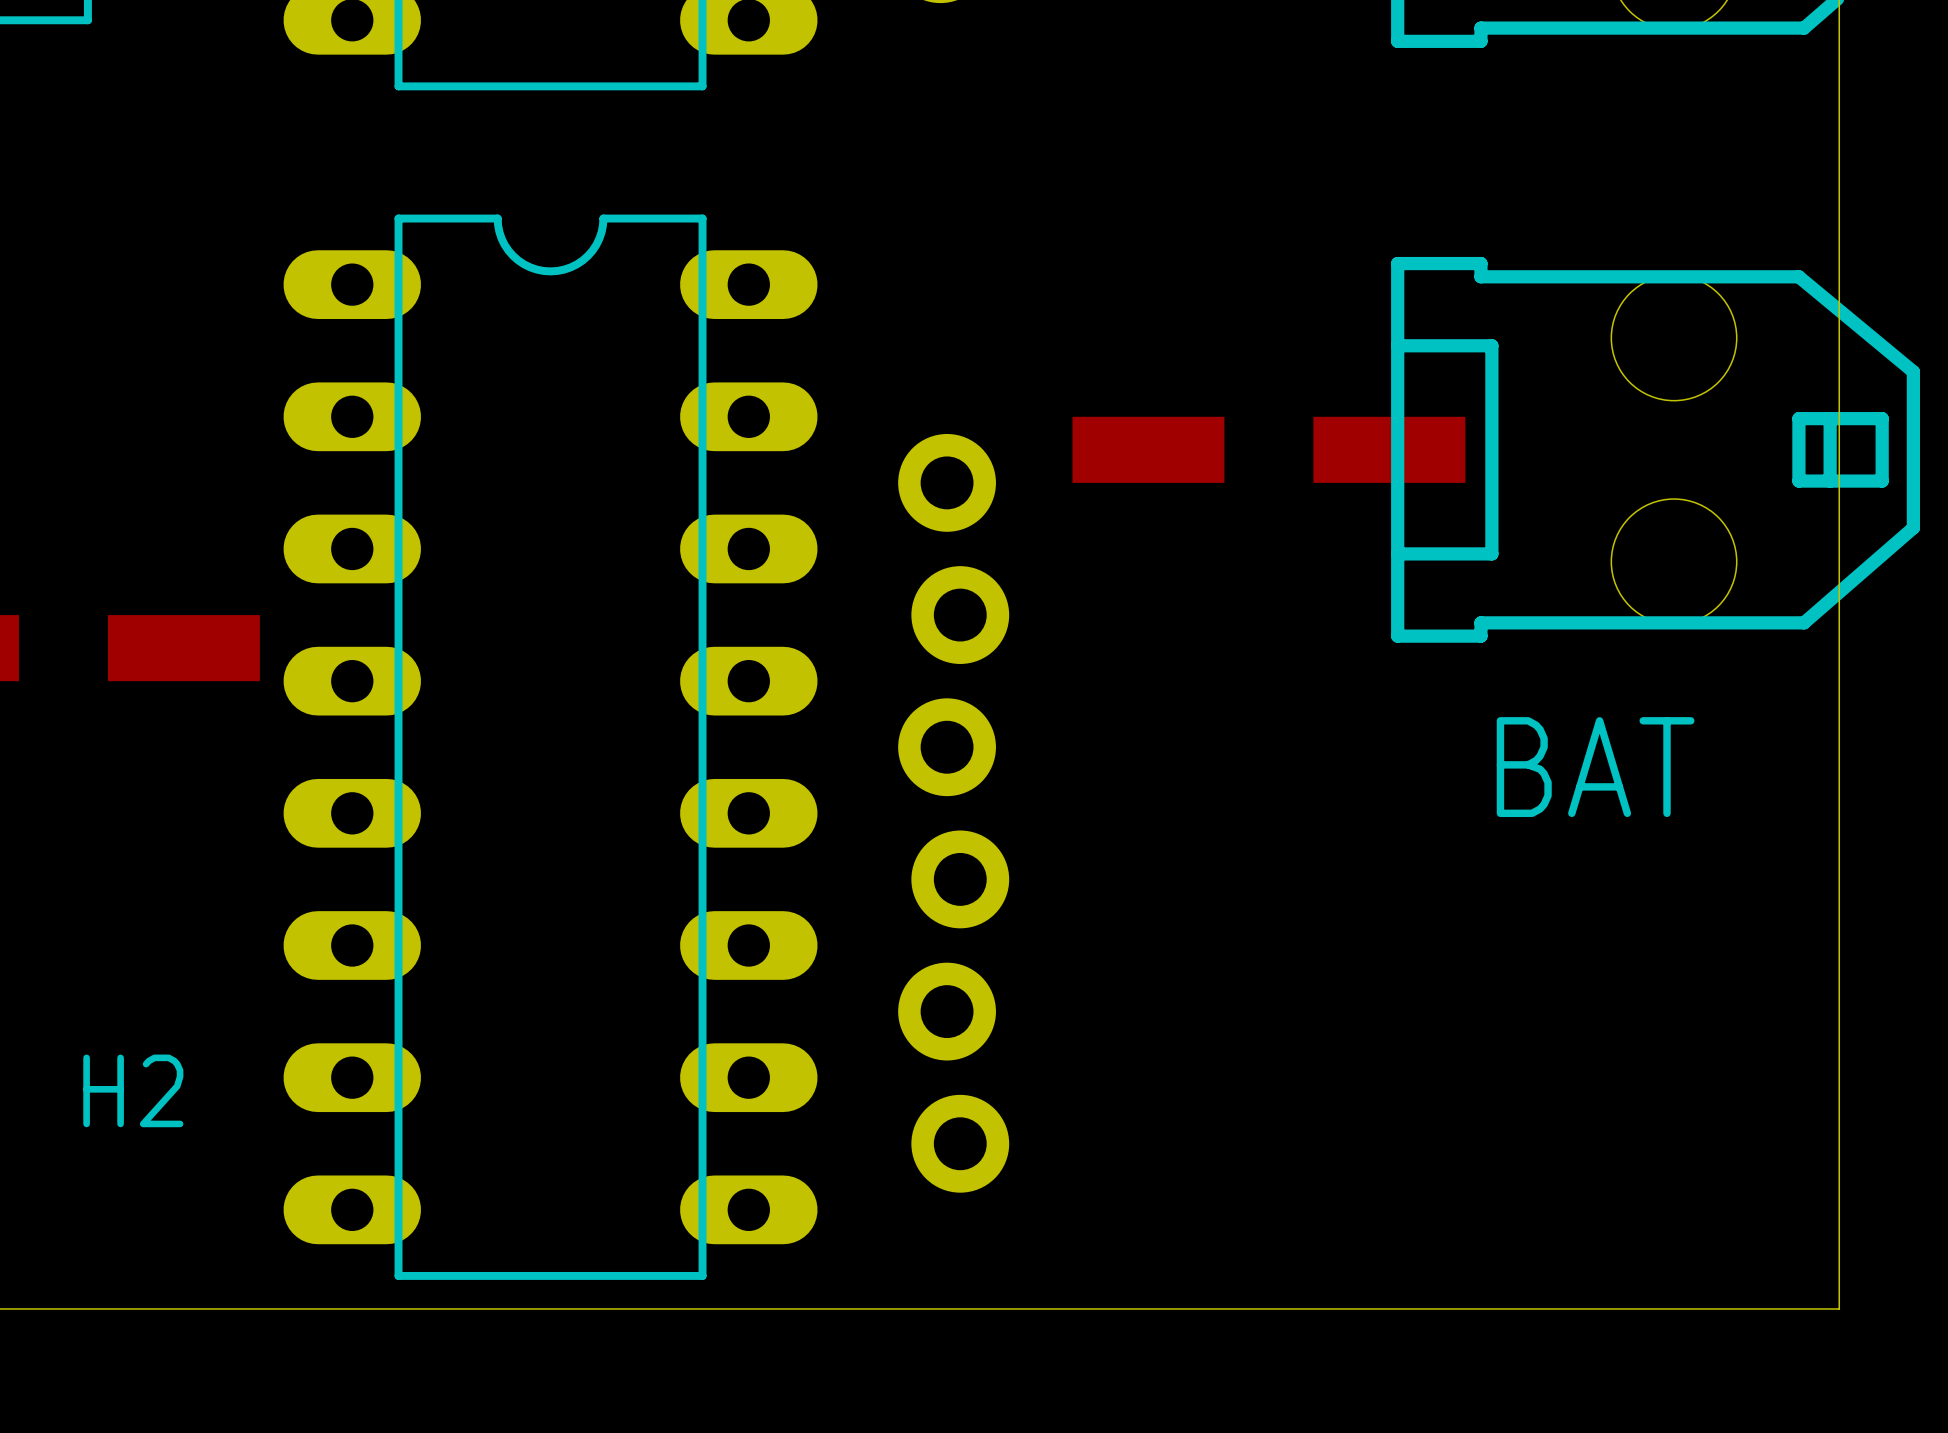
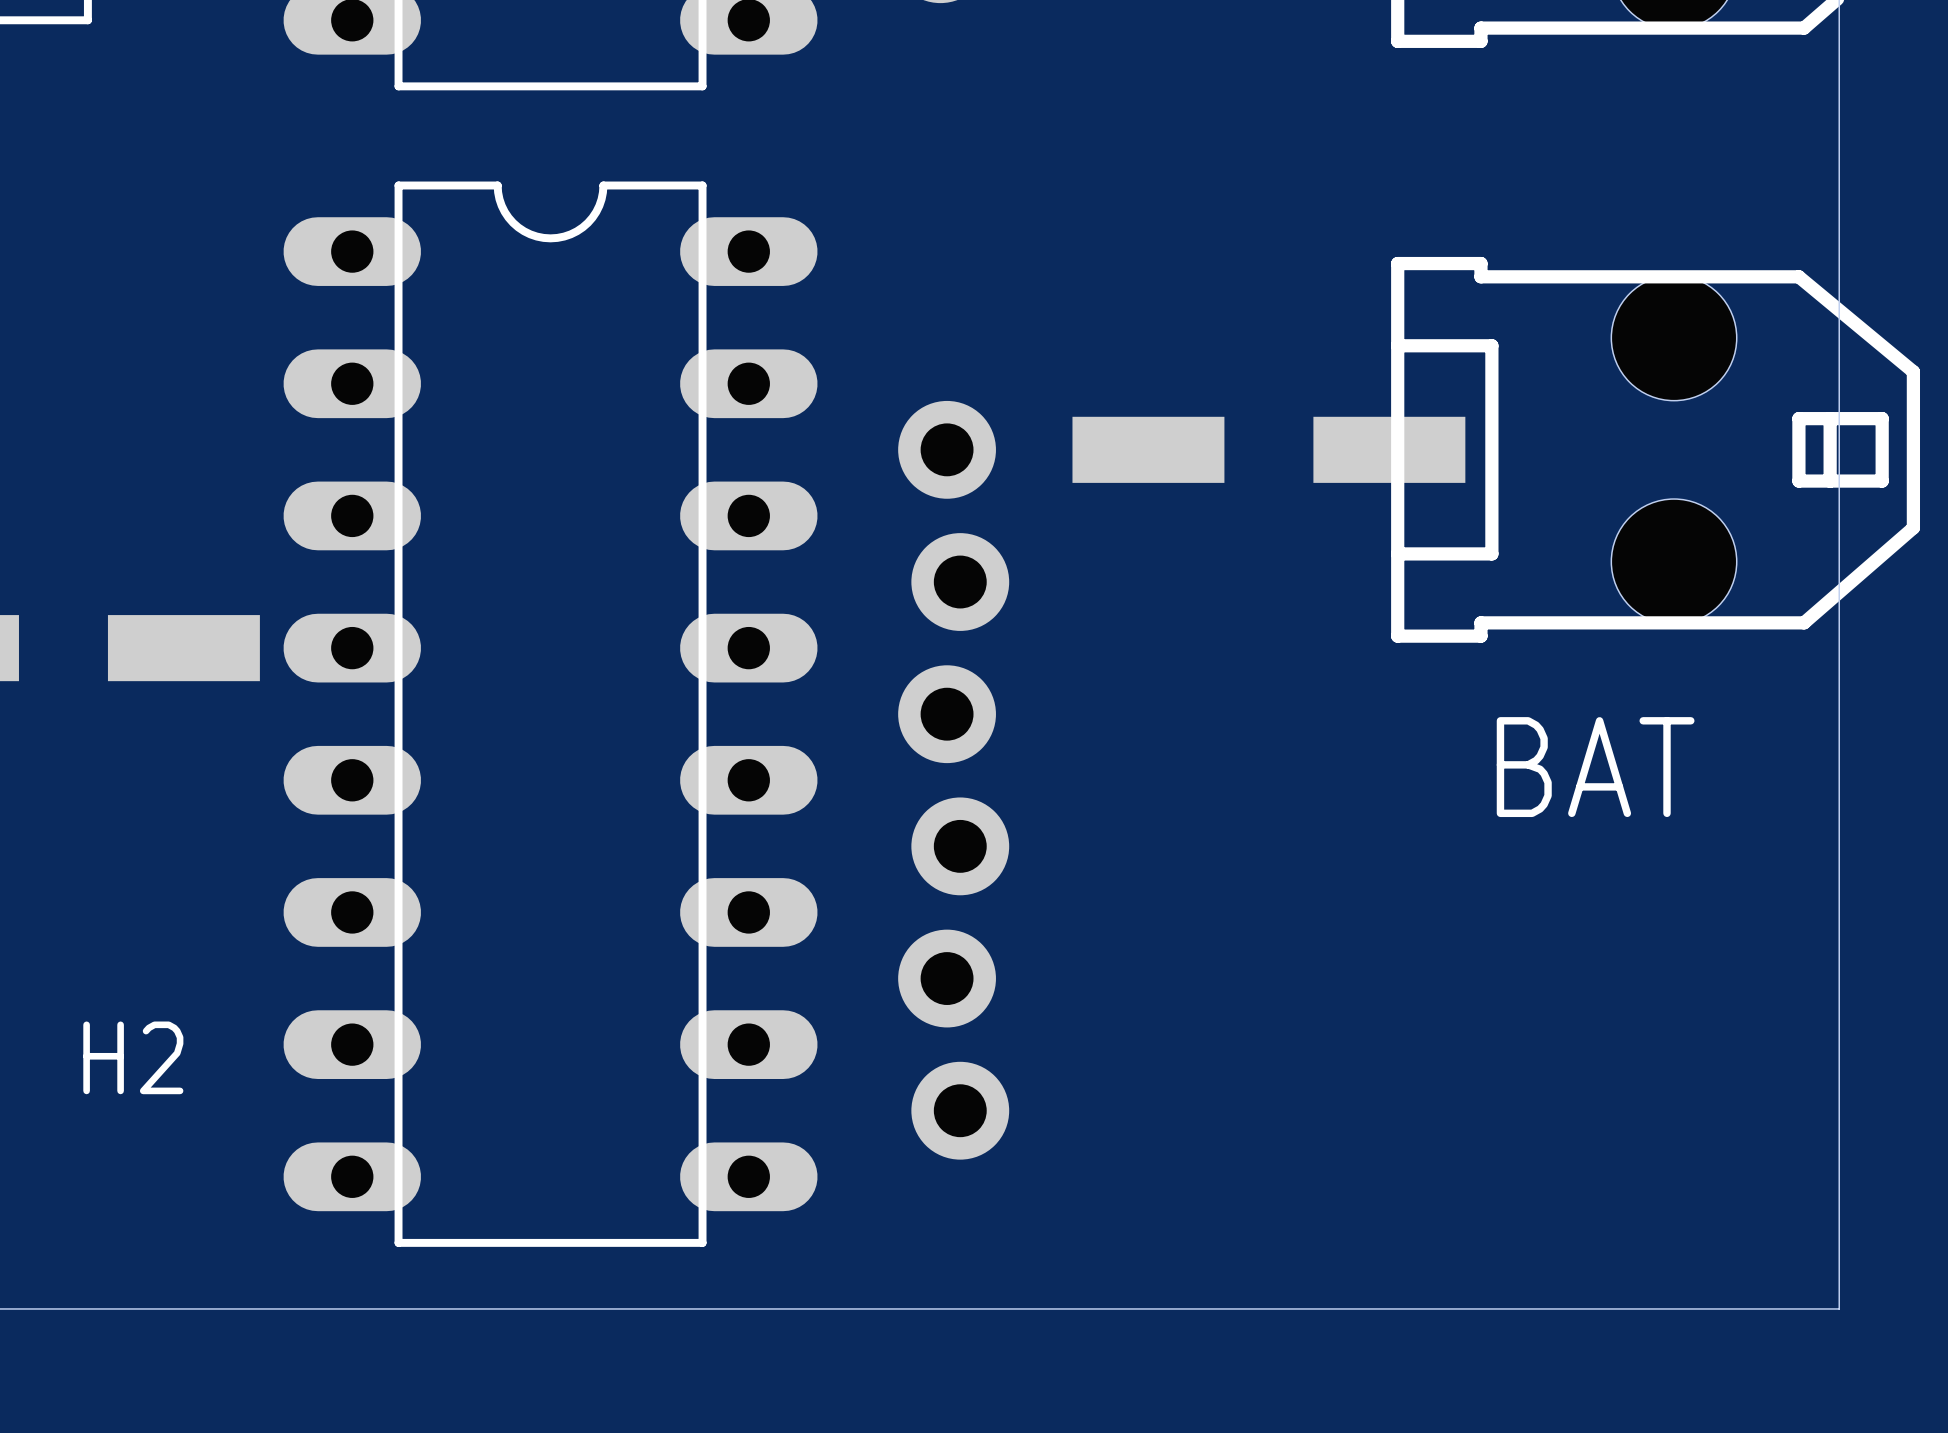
H2 position: (550, 747) -> (550, 714)
part position: (953, 813) -> (953, 780)

